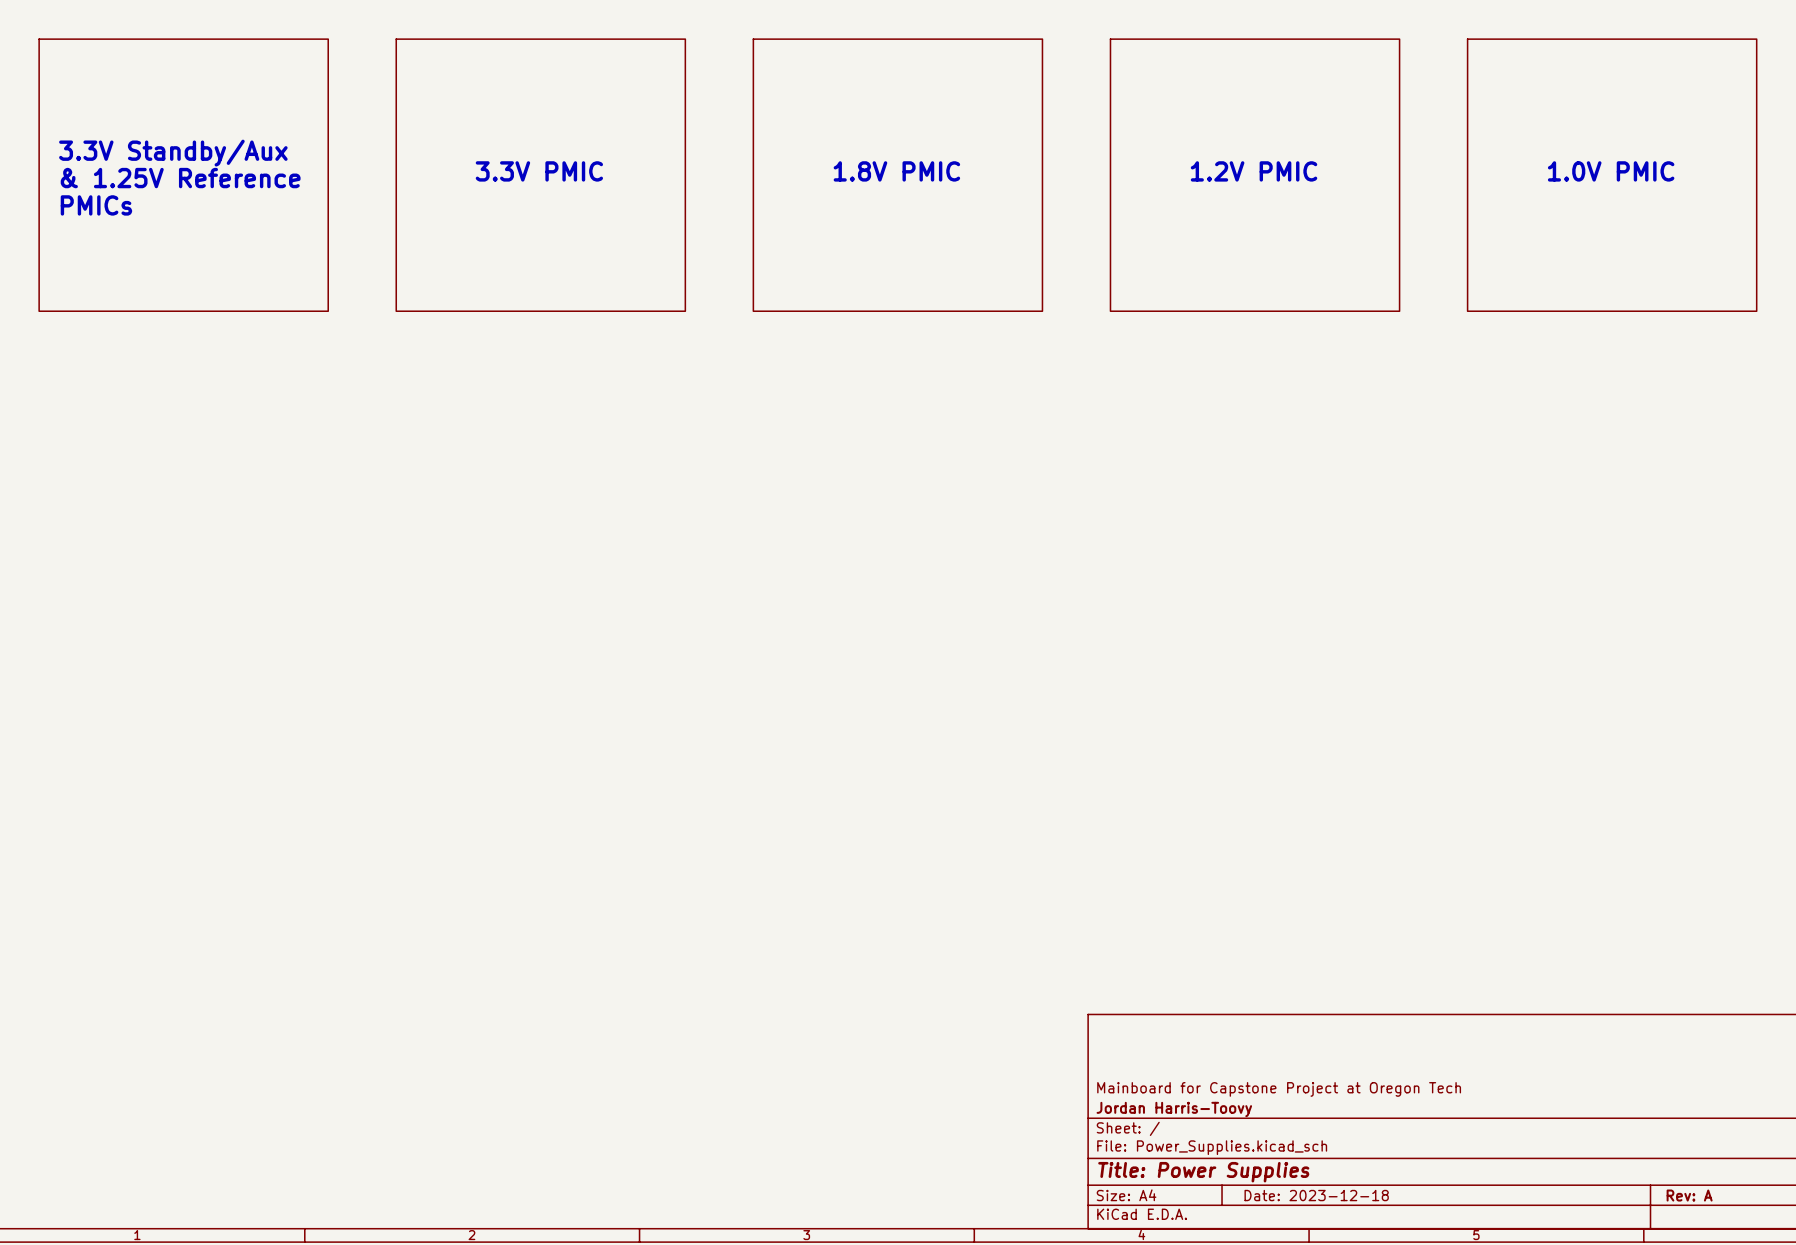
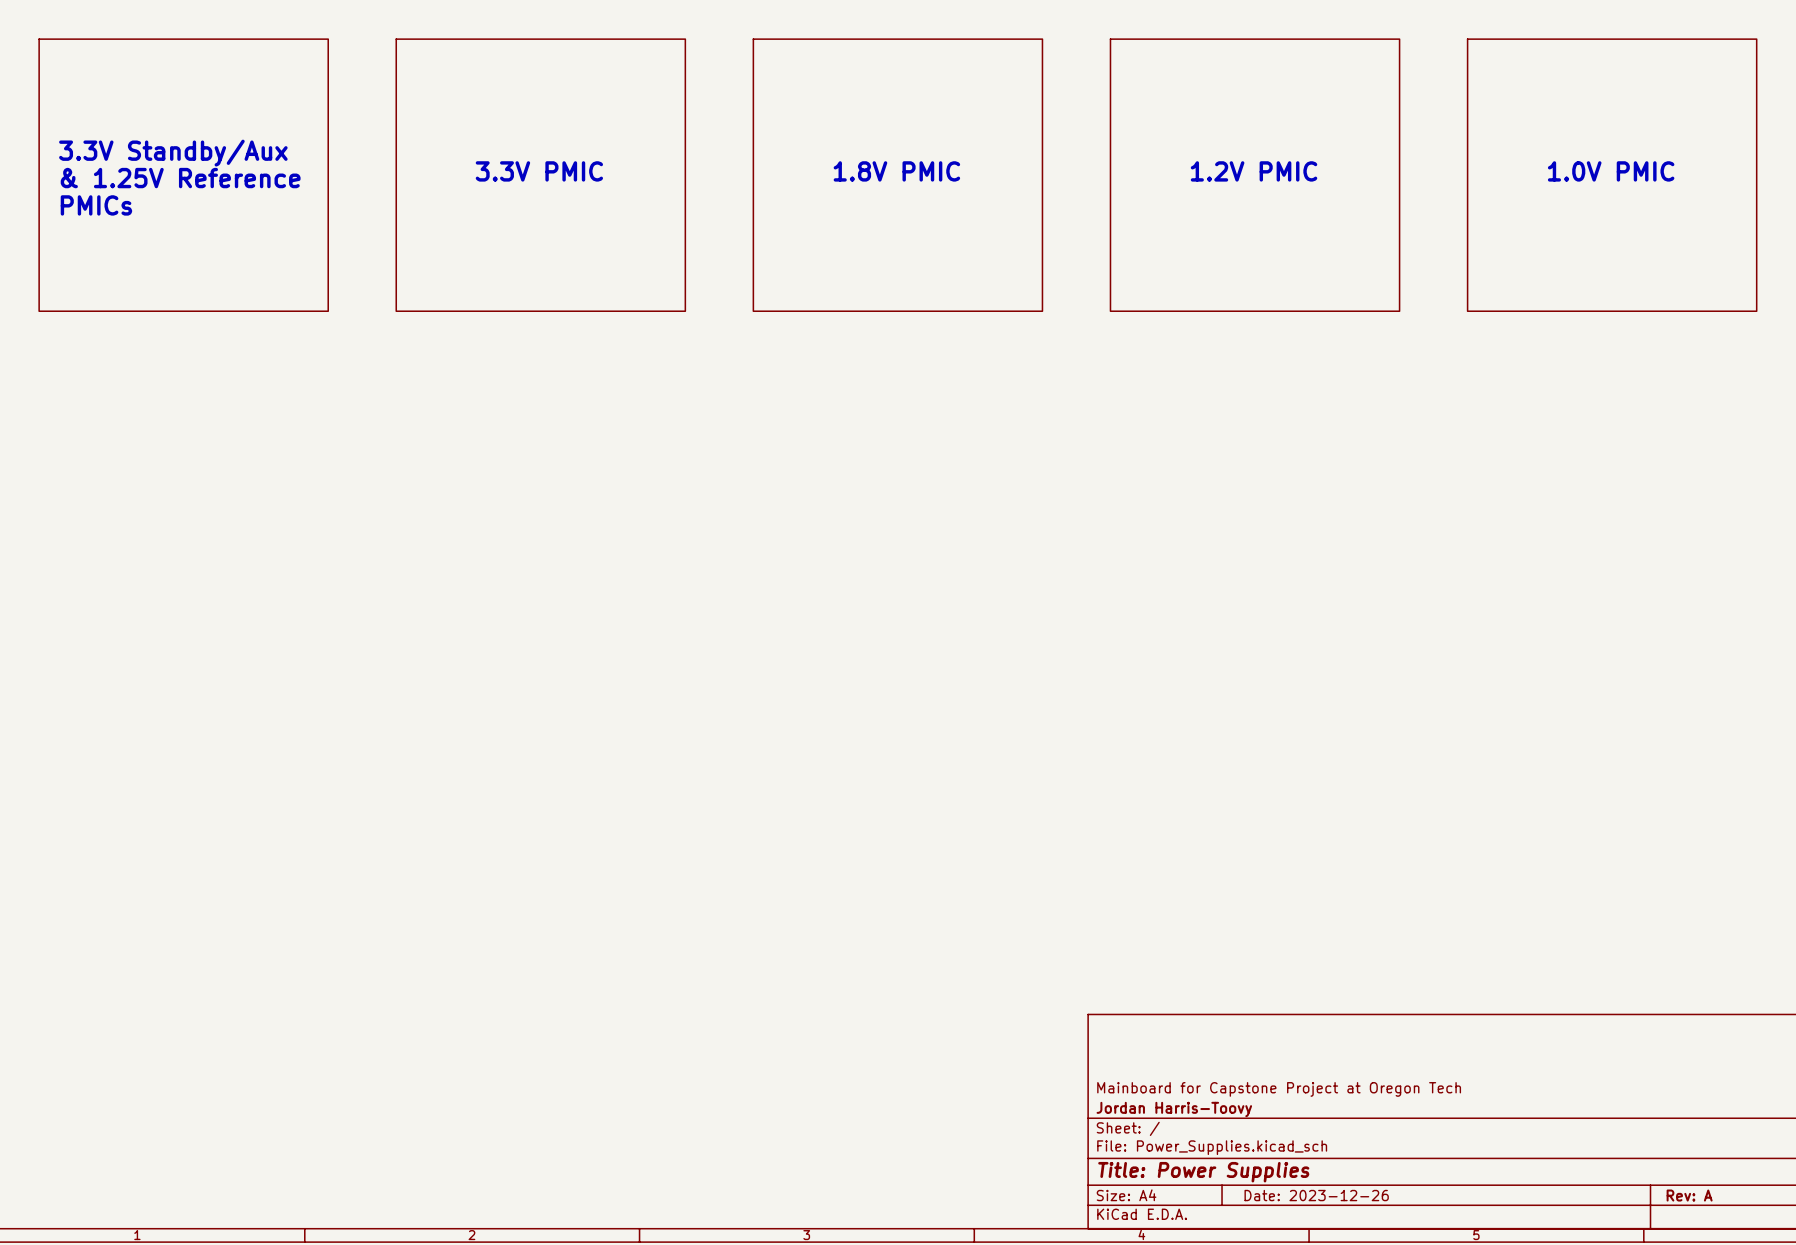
title block: Date: 2023-12-18 (1316, 1195) -> Date: 2023-12-26 (1316, 1195)

